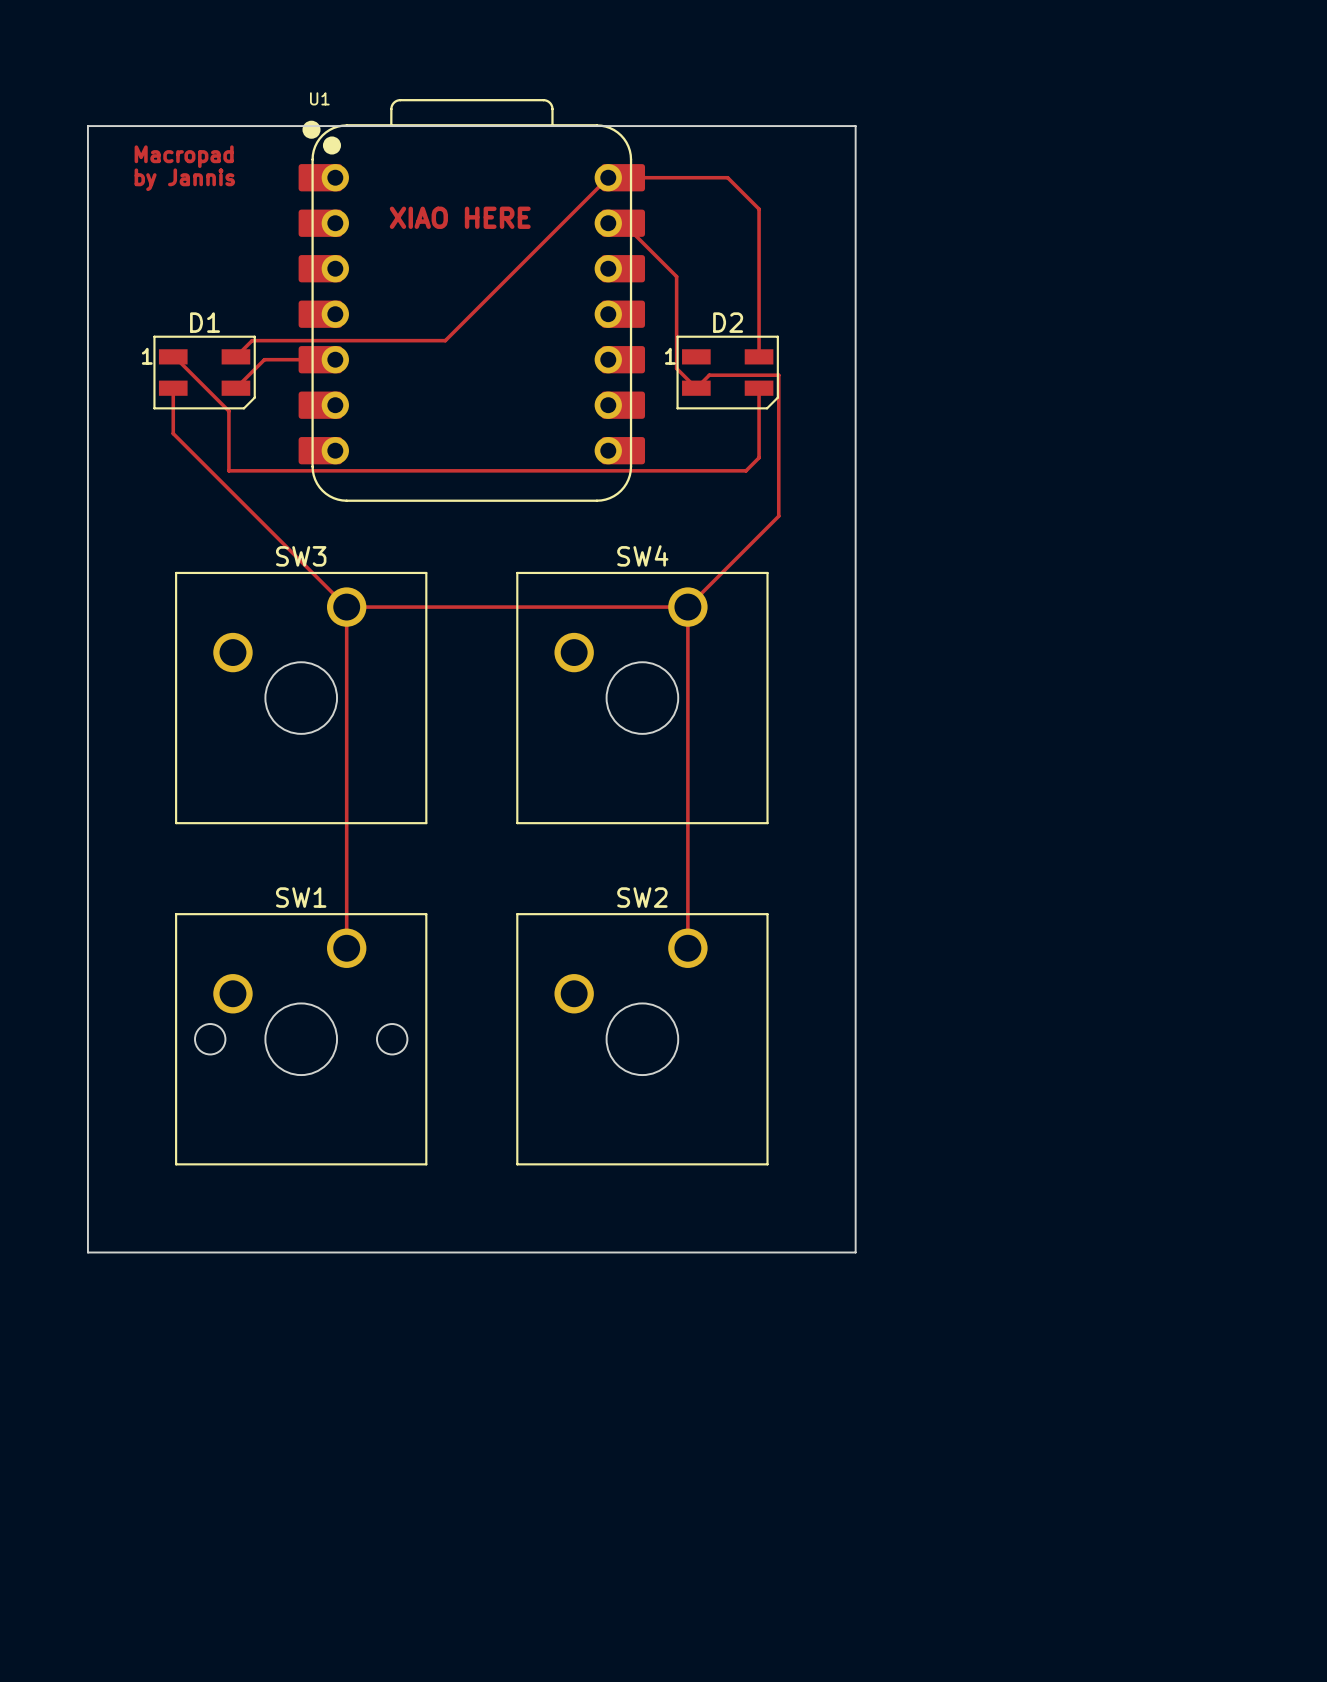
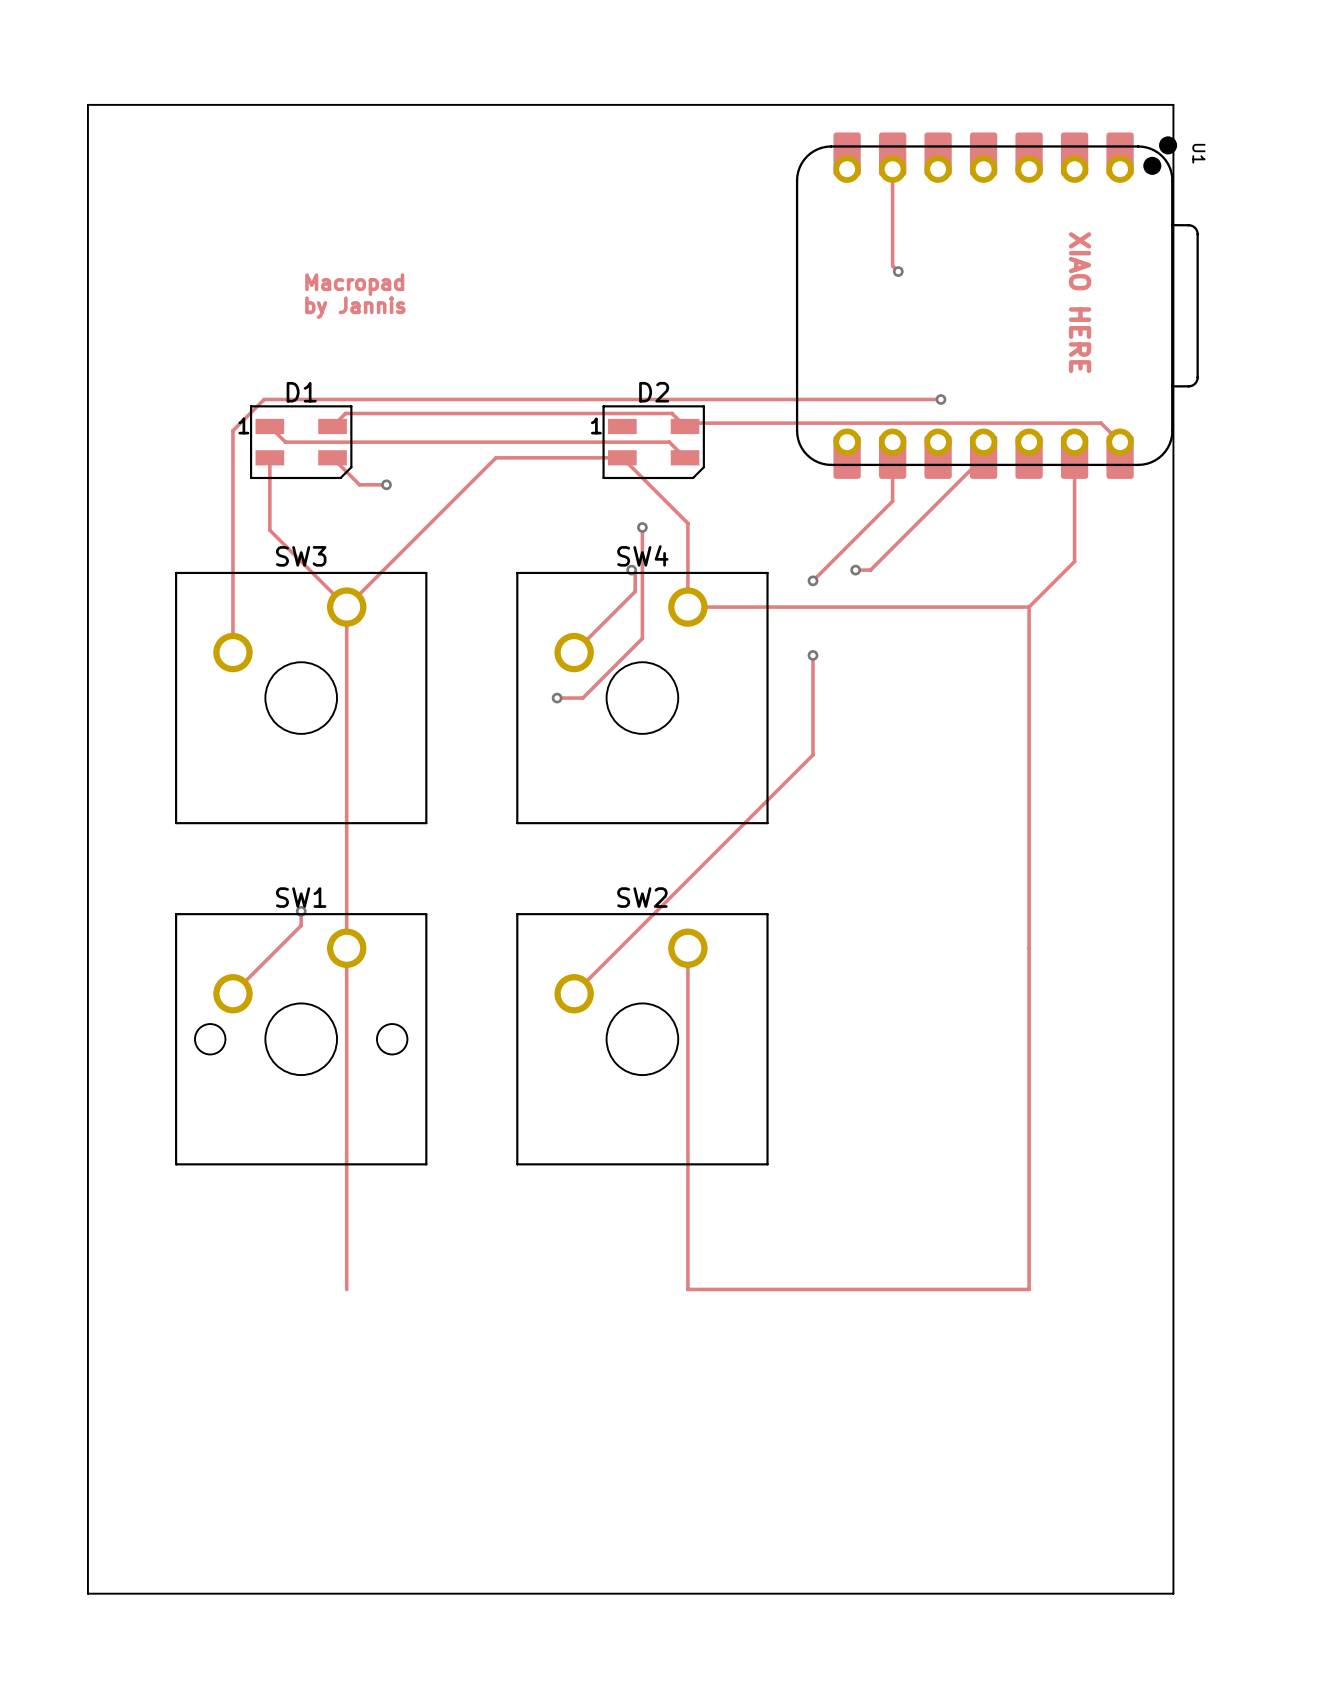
board edge: (87, 126) (855, 126) (855, 1252) (87, 1252) -> (87, 126) (87, 104) (1173, 104) (1173, 1593) (87, 1593) (87, 1252)
text position: Macropad (184, 156) -> Macropad (354, 284)
track: none -> (892, 169) (892, 265) (898, 271)
track: (608, 177) (445, 340) (252, 340) (235, 356) -> none
track: (623, 177) (727, 177) (759, 209) (759, 356) -> none
text position: by Jannis (184, 179) -> by Jannis (355, 307)
text: XIAO HERE (460, 217) -> none
track: (623, 223) (676, 276) (676, 368) (696, 388) (709, 375) (778, 375) (778, 516) (687, 607) -> none
via: none -> (898, 271)
U1 rotation: 0° (471, 300) -> 90° clockwise (997, 305)
U1 position: (471, 300) -> (997, 305)
text: none -> XIAO HERE (1080, 302)
track: (173, 356) (228, 411) (228, 470) (746, 470) (759, 457) (759, 388) -> none
track: (335, 359) (264, 359) (235, 388) -> none
D1 position: (204, 372) -> (301, 442)
D2 position: (727, 372) -> (653, 442)
track: (173, 388) (173, 433) (269, 530) -> (269, 457) (269, 530)
track: none -> (940, 399) (264, 399) (232, 430) (232, 652)
via: none -> (940, 399)
track: none -> (271, 426) (285, 442) (669, 442) (685, 457)
track: none -> (332, 426) (345, 413) (672, 413) (685, 426) (688, 423) (1101, 423) (1120, 442)
track: none -> (1074, 442) (1074, 561) (1029, 607)
track: none -> (332, 457) (359, 484) (386, 484)
track: none -> (892, 457) (892, 501) (813, 580)
track: none -> (983, 457) (870, 570) (855, 570)
via: none -> (386, 484)
track: none -> (642, 527) (642, 638) (582, 698) (557, 698)
via: none -> (642, 527)
track: none -> (631, 570) (635, 570) (635, 591) (574, 652)
via: none -> (631, 570)
via: none -> (855, 570)
via: none -> (813, 580)
track: (346, 607) (687, 607) -> (346, 607) (495, 457) (622, 457) (687, 523) (687, 607) (1029, 607)
track: (687, 607) (687, 948) -> (1029, 607) (1029, 1289) (687, 1289) (687, 948)
track: none -> (813, 655) (813, 754) (574, 993)
via: none -> (813, 655)
via: none -> (557, 698)
track: none -> (301, 911) (301, 925) (232, 993)
via: none -> (301, 911)
track: none -> (346, 948) (346, 1289)

